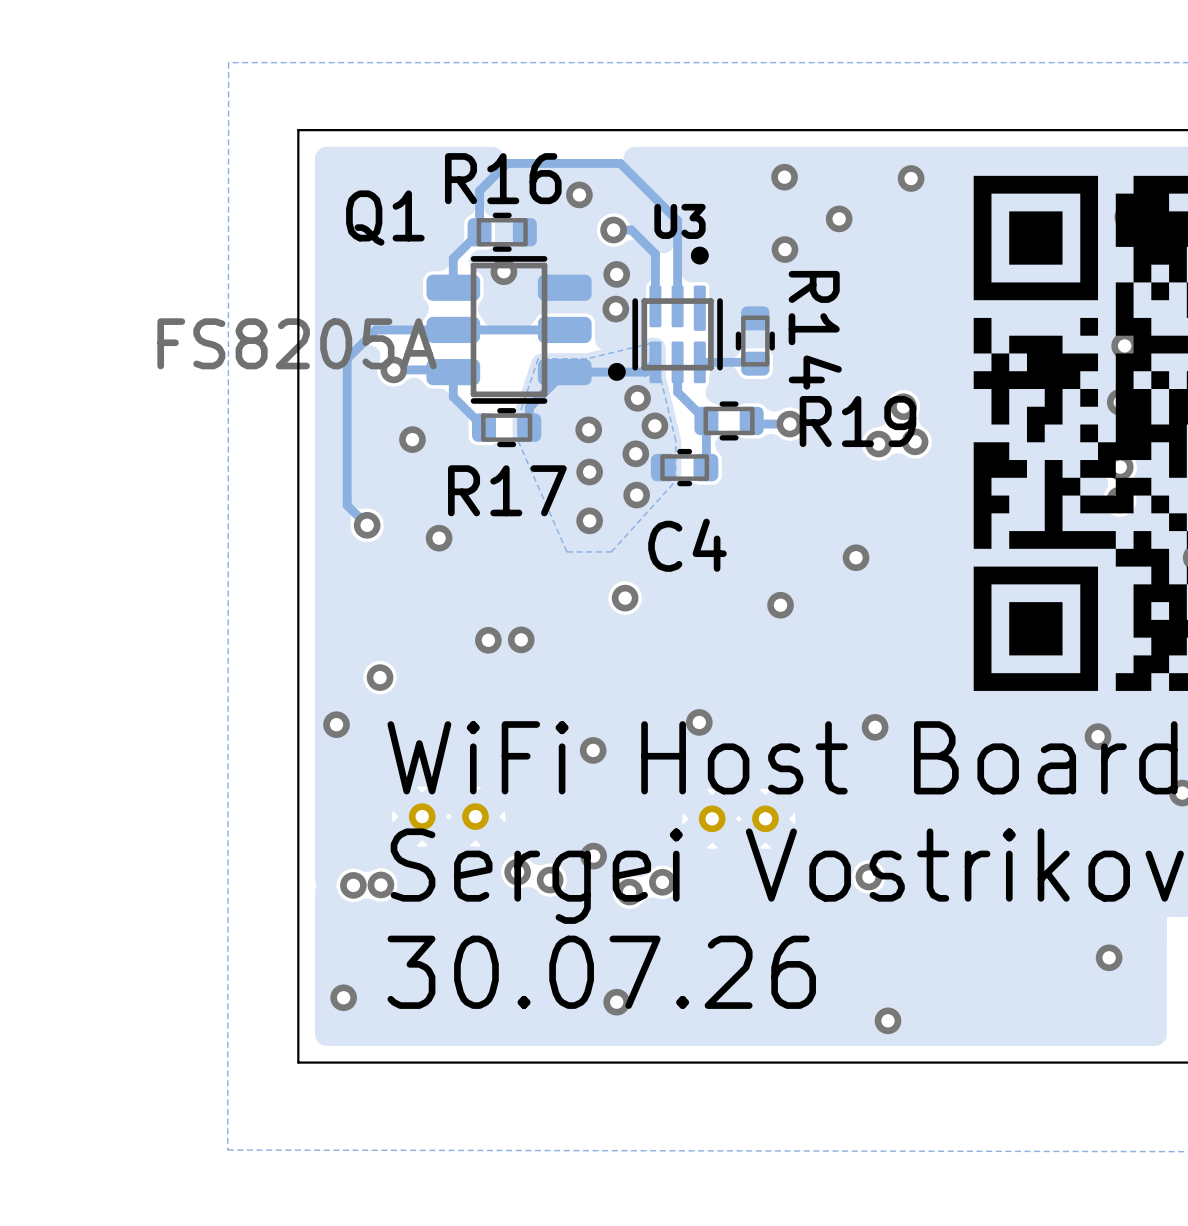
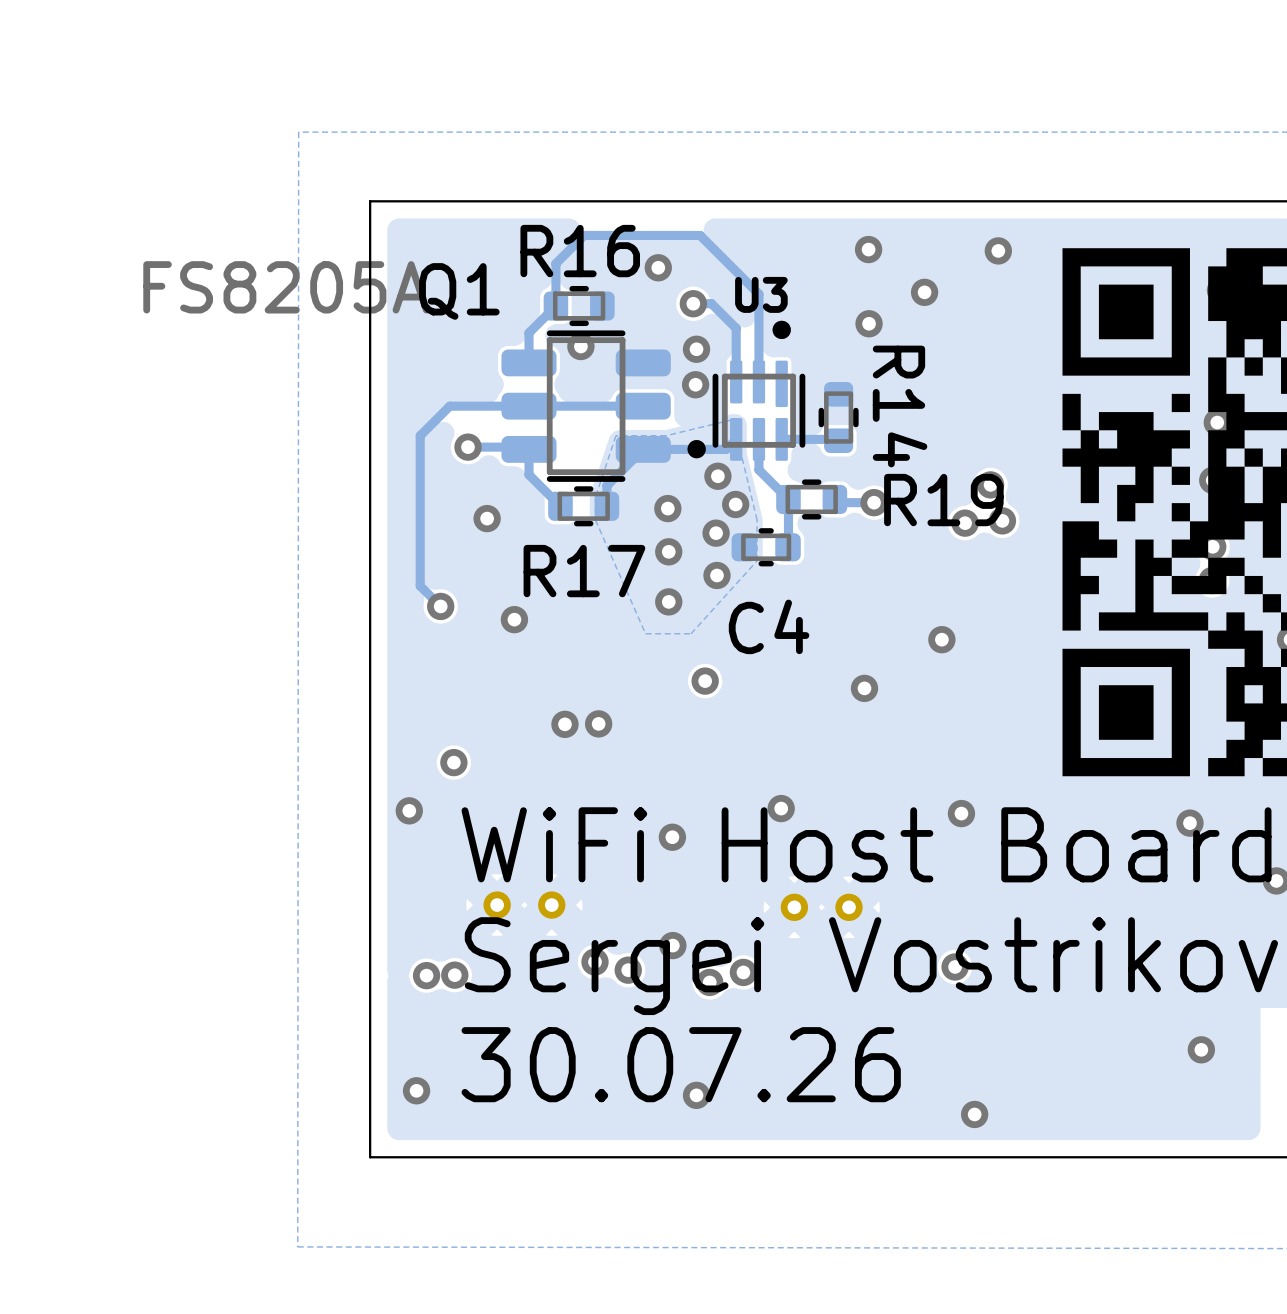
Q1 value position: FS8205A (297, 343) -> FS8205A (286, 287)

